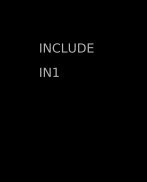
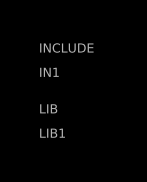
LIB1: none -> LIB (52, 121)

